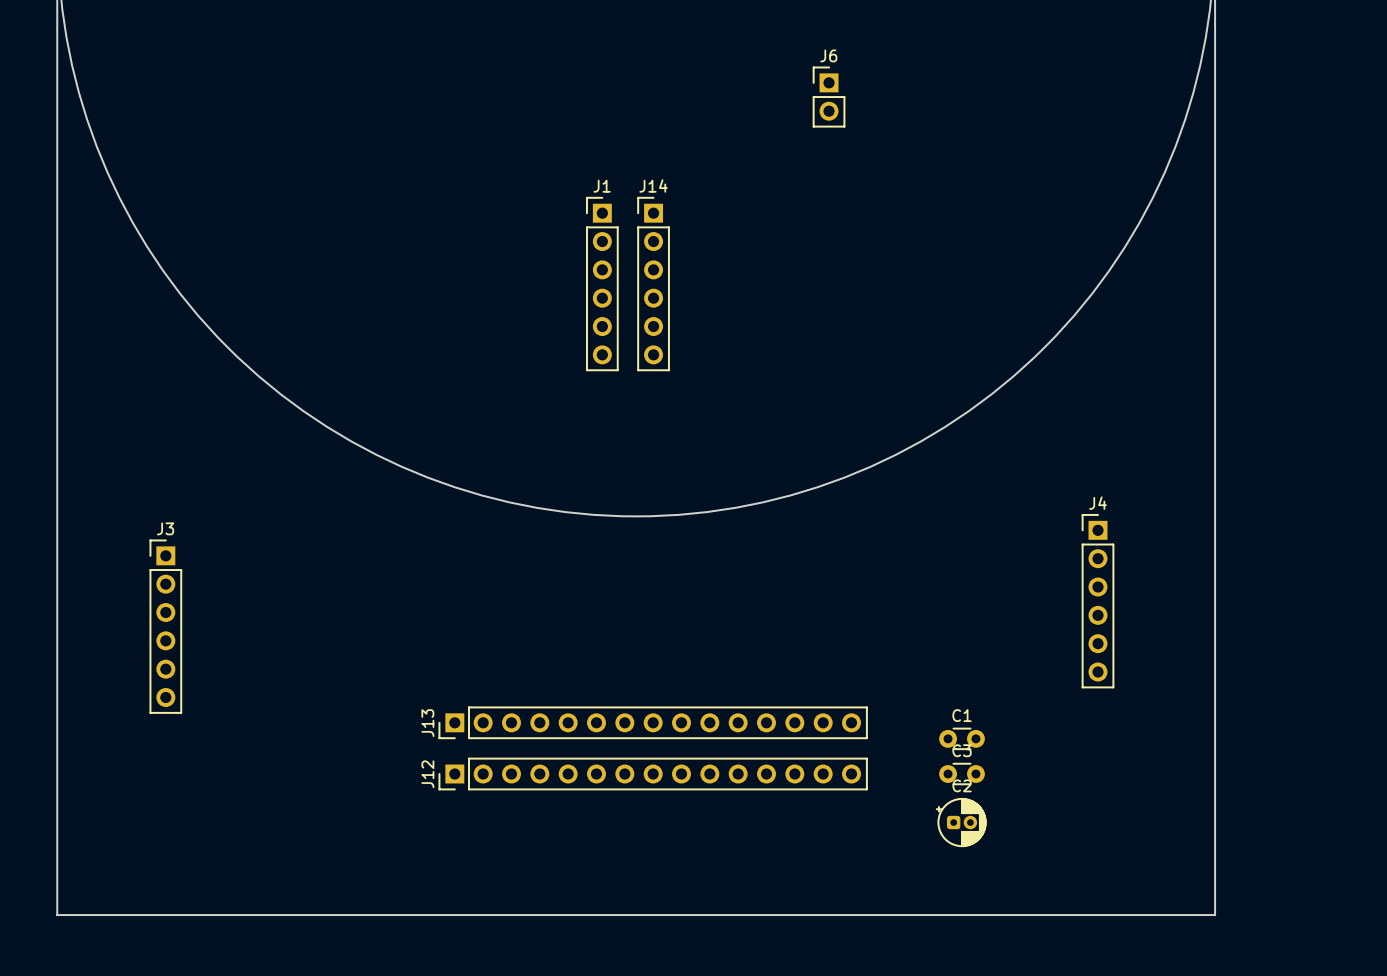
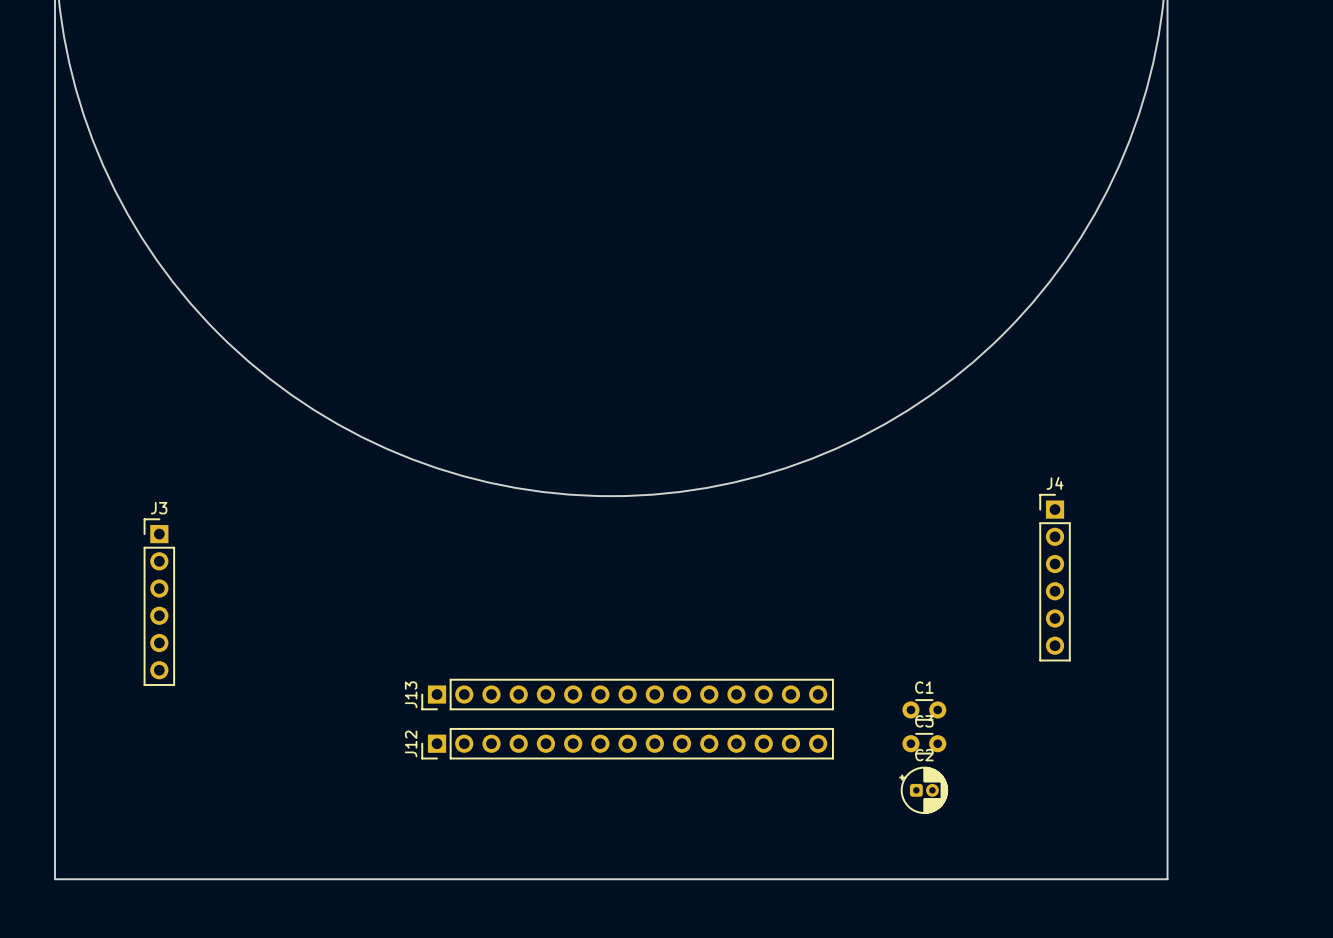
J6: (829, 97) -> none
J1: (602, 284) -> none
J14: (653, 284) -> none

